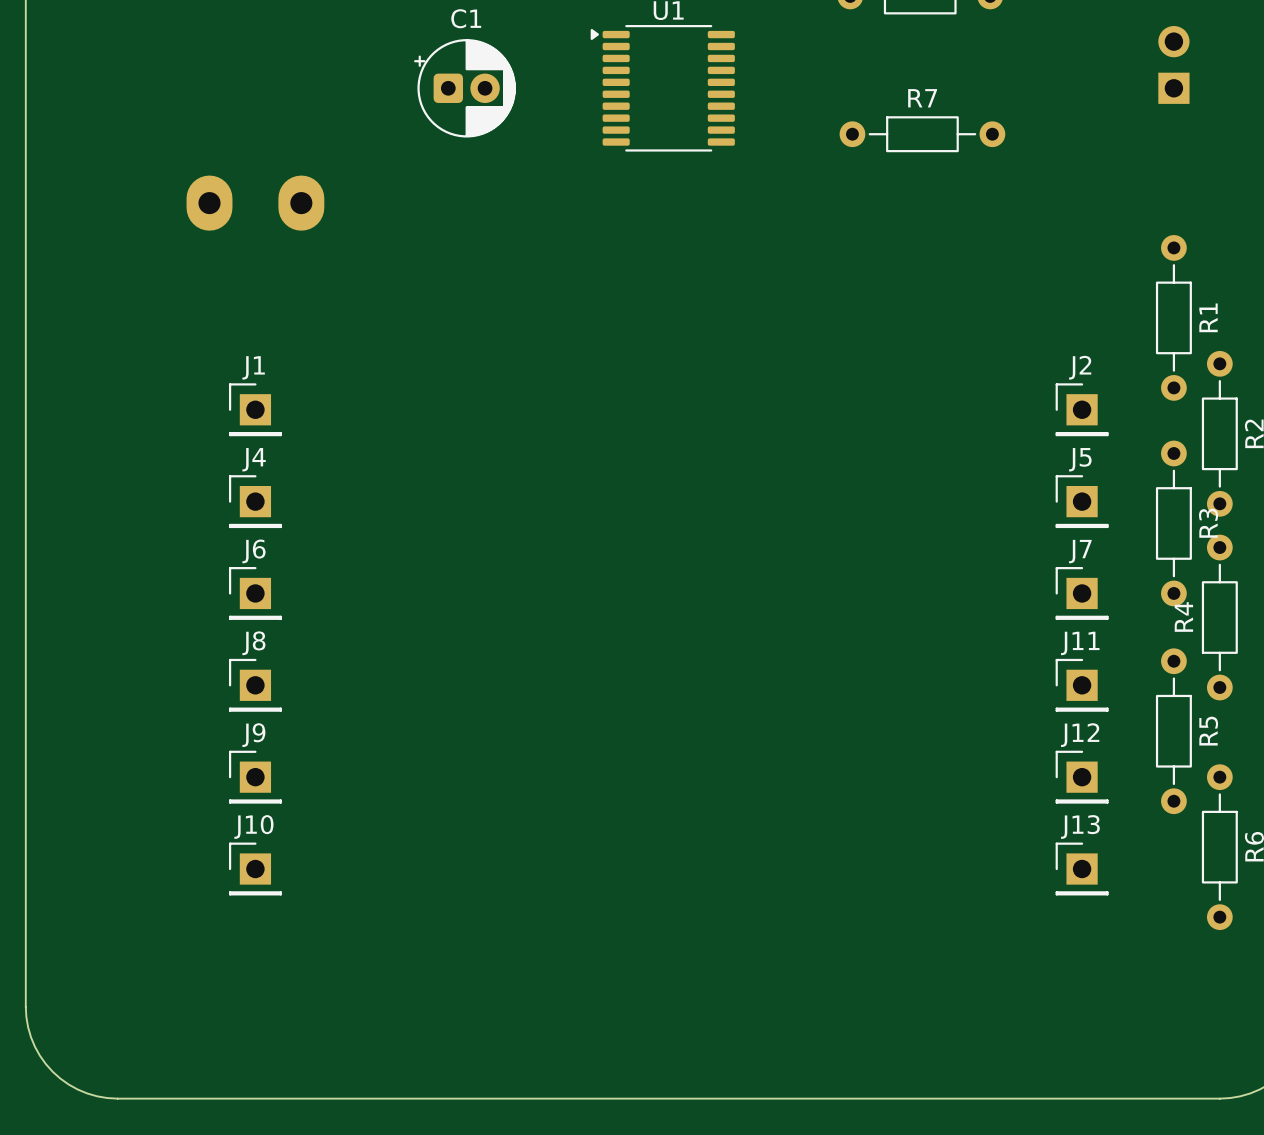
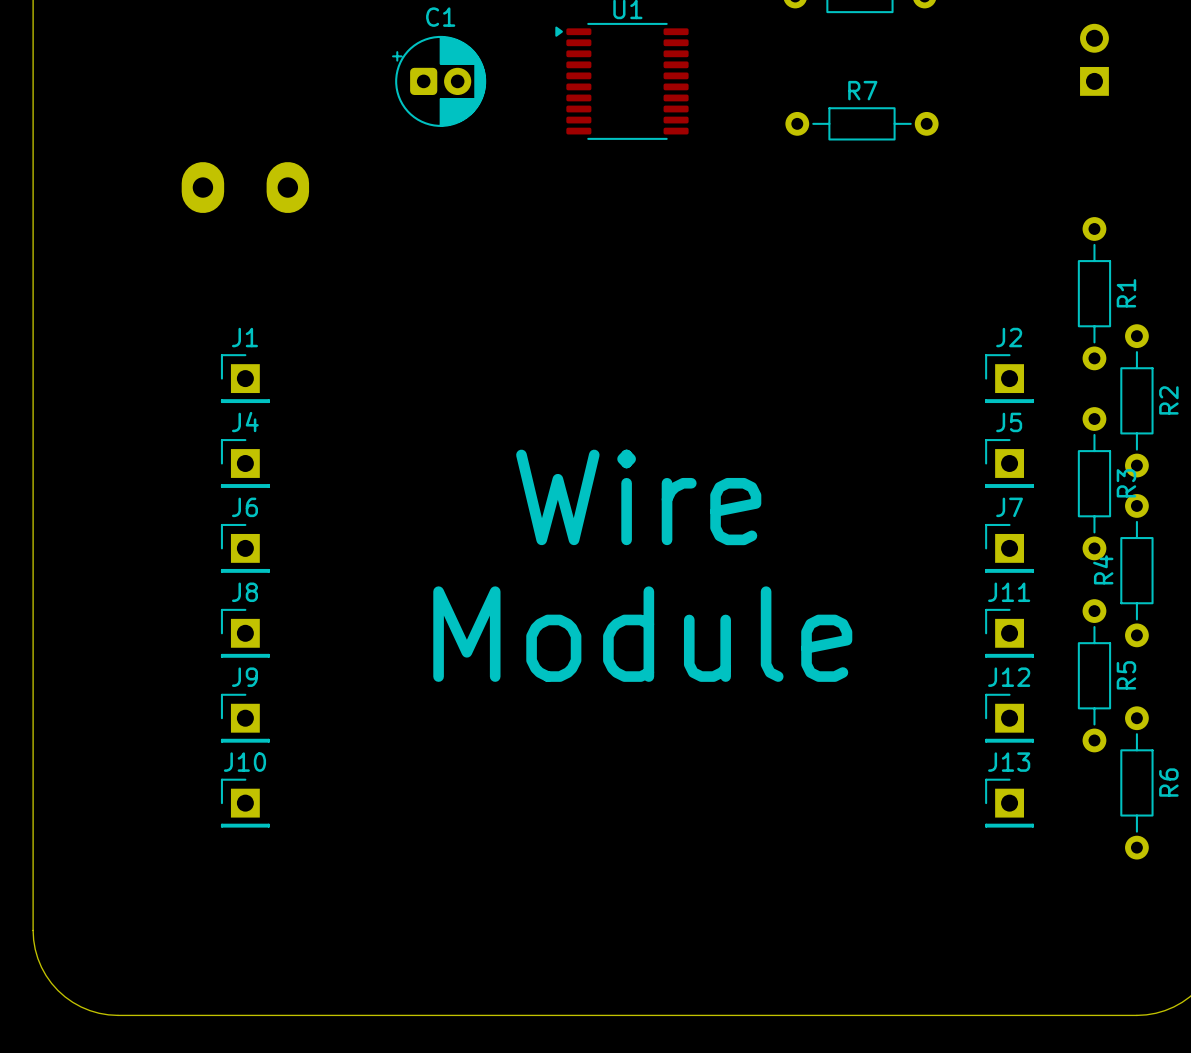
text: none -> Wire (638, 497)
text: none -> Module (642, 634)

